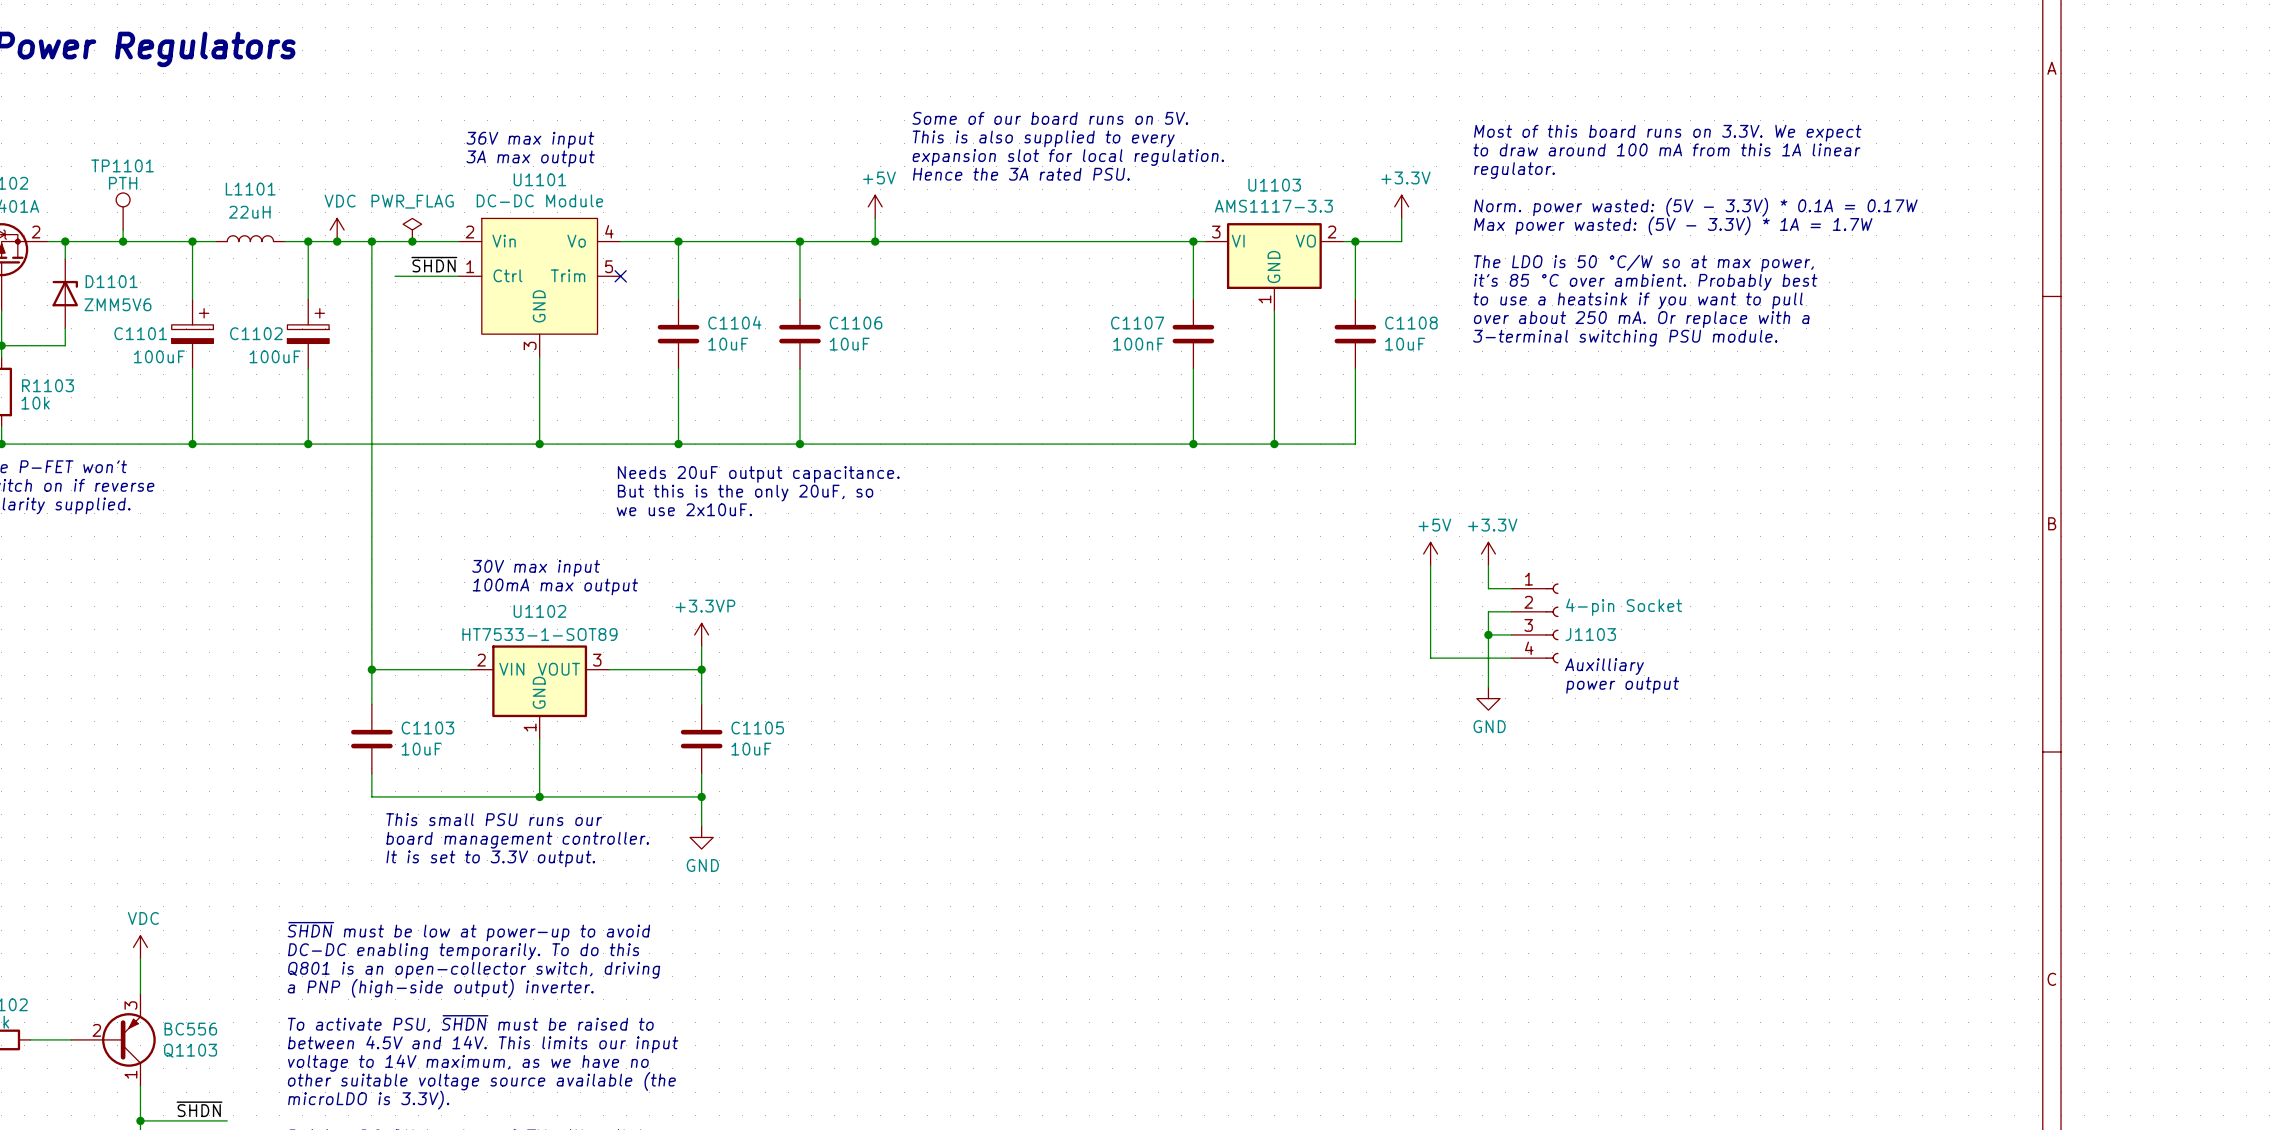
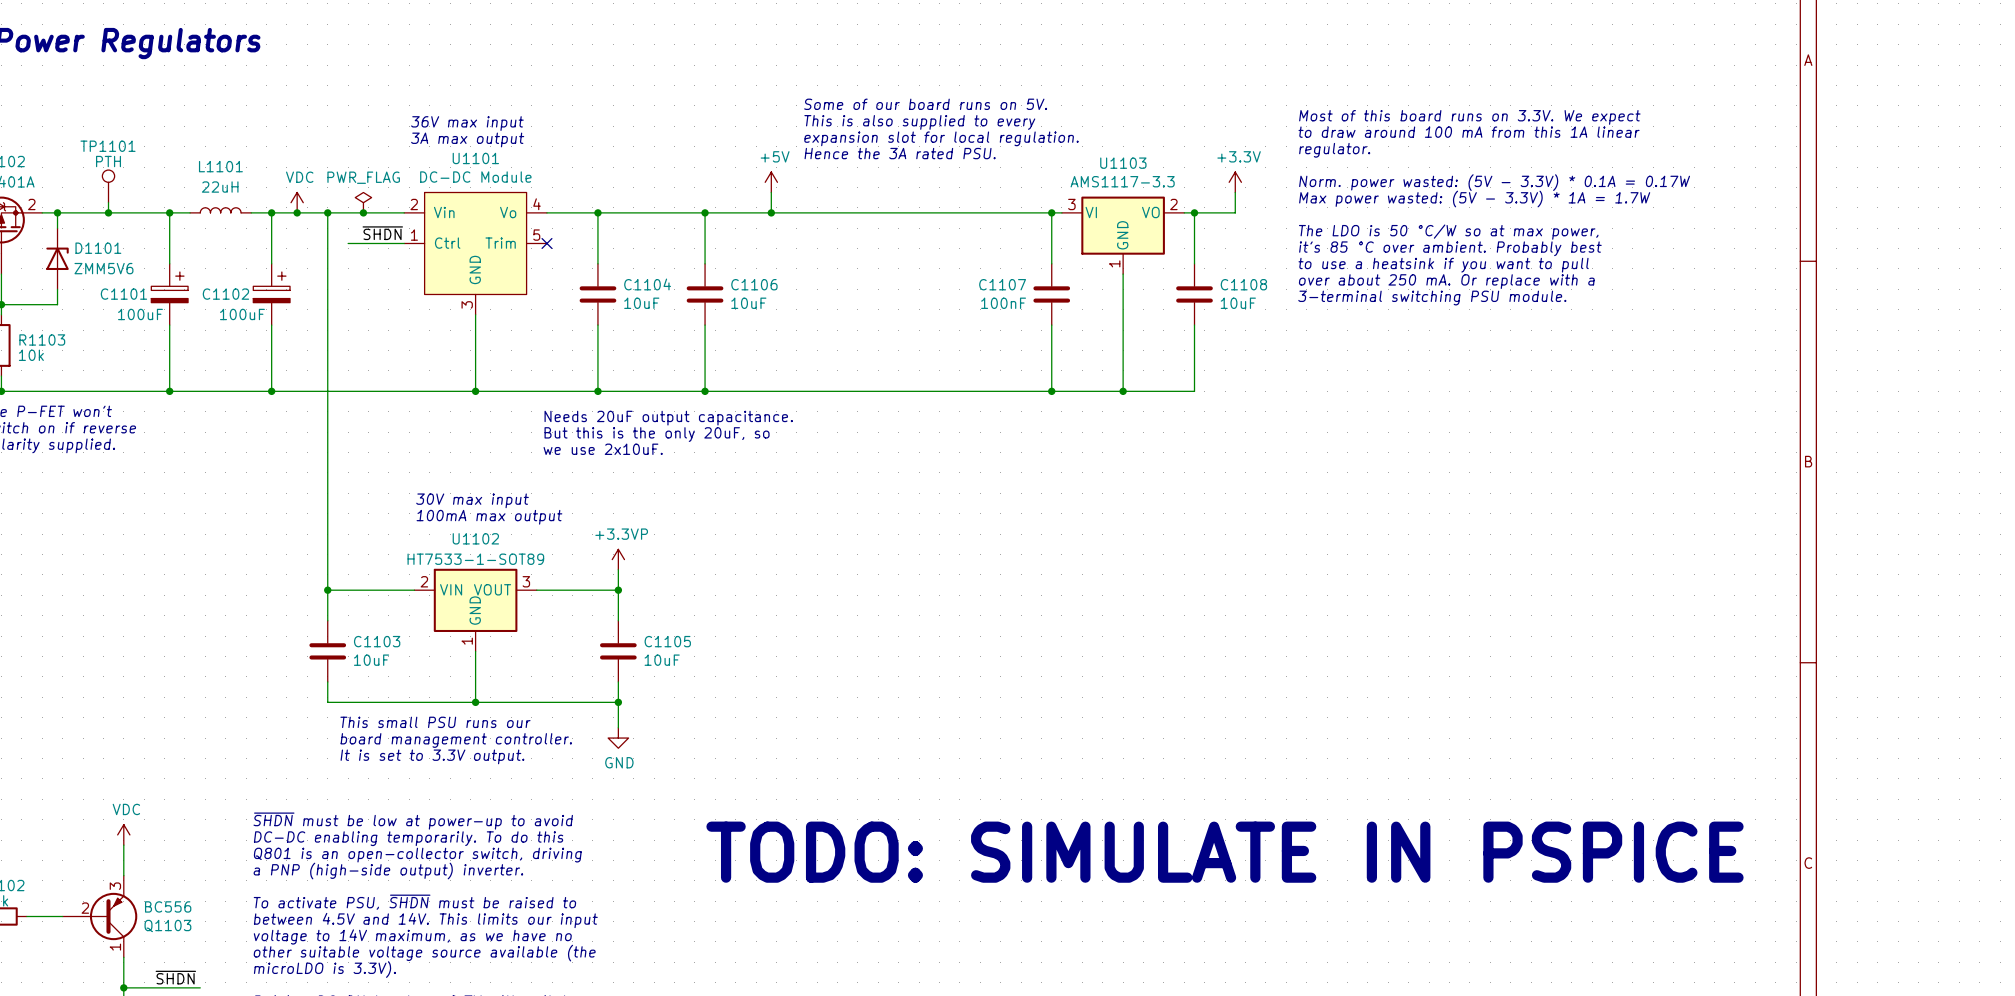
power symbol: +5V (1430, 553) -> none
power symbol: +3.3V (1488, 553) -> none
wire: (1430, 565) (1430, 658) (1511, 658) -> none
wire: (1488, 565) (1488, 588) (1511, 588) -> none
wire: (1511, 611) (1488, 611) (1488, 687) -> none
J1103: 4-pin Socket (1535, 623) -> none
wire: (1488, 634) (1511, 634) -> none
junction: (1488, 634) -> none
text: Auxilliary (1604, 666) -> none
text: power output (1622, 685) -> none
power symbol: GND (1488, 698) -> none
text: none -> TODO: SIMULATE IN PSPICE (1225, 852)

